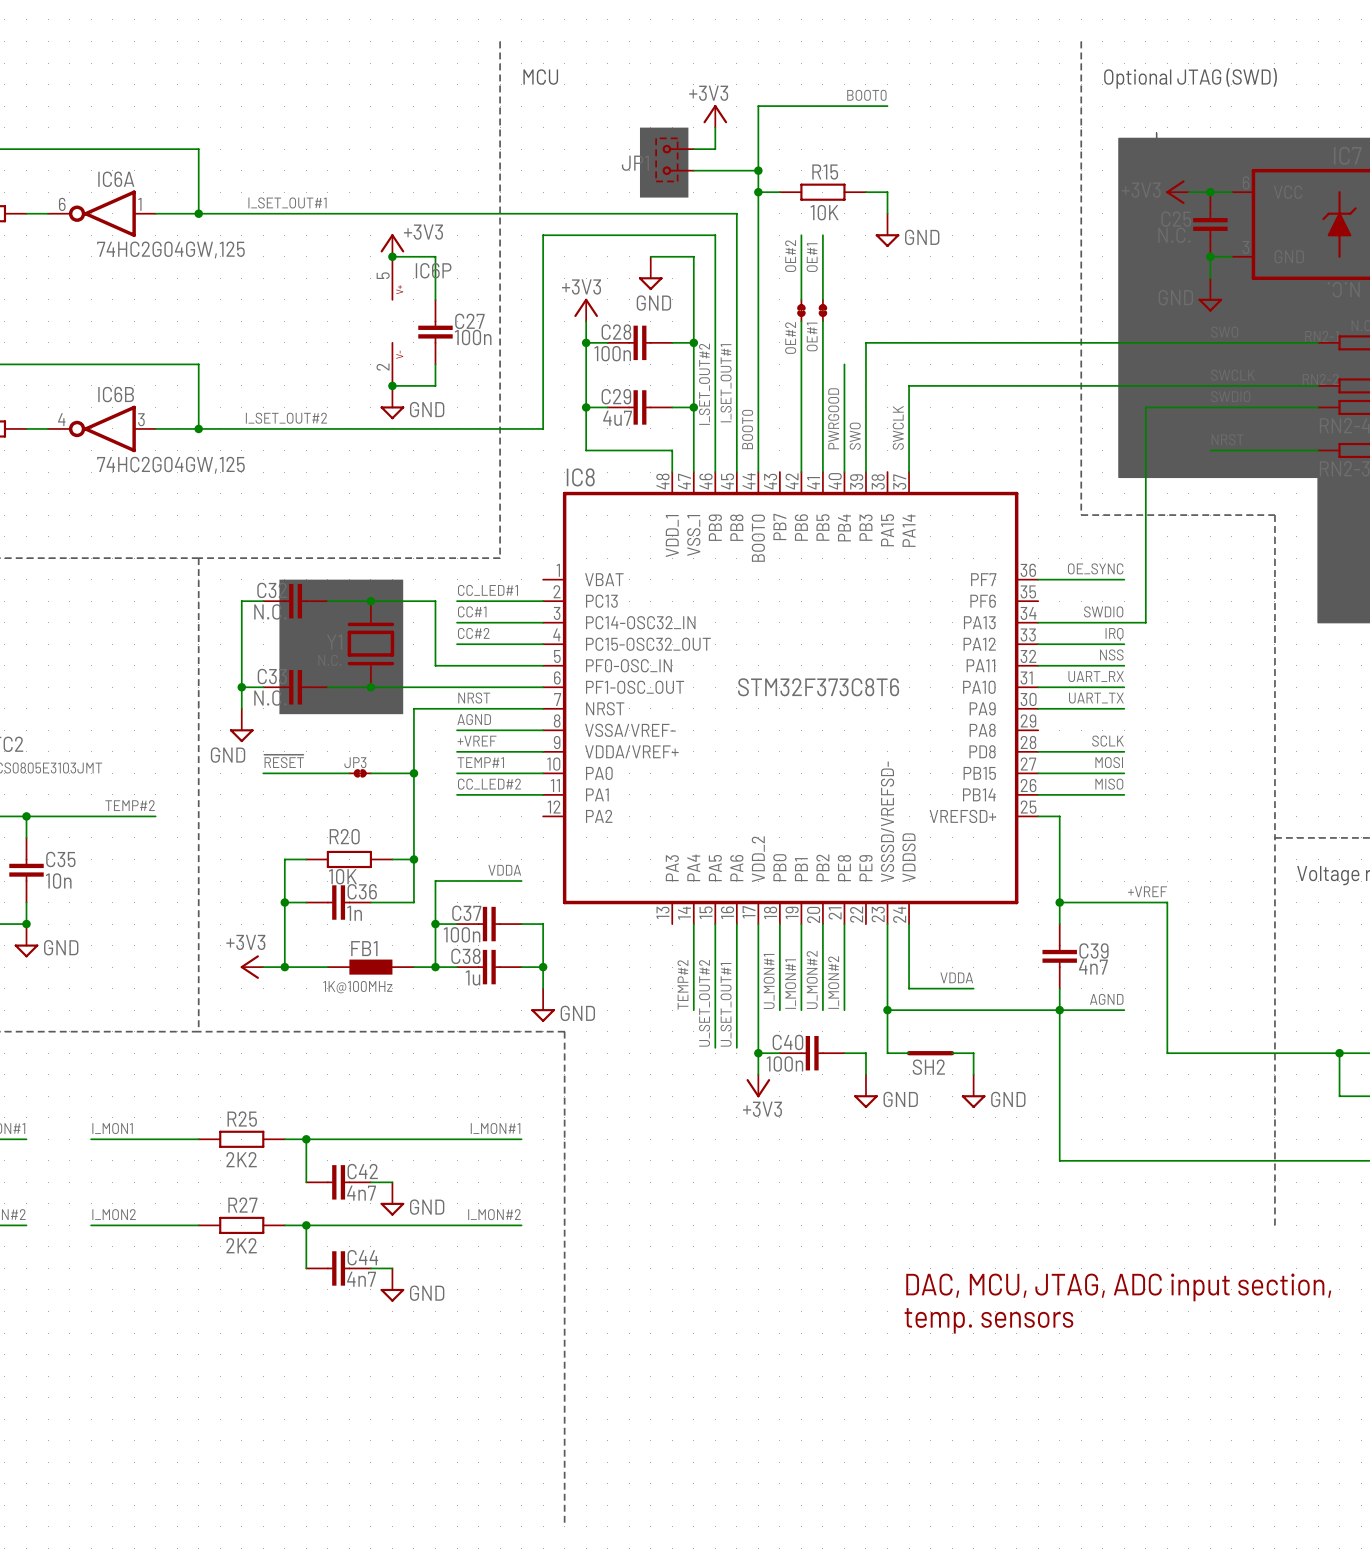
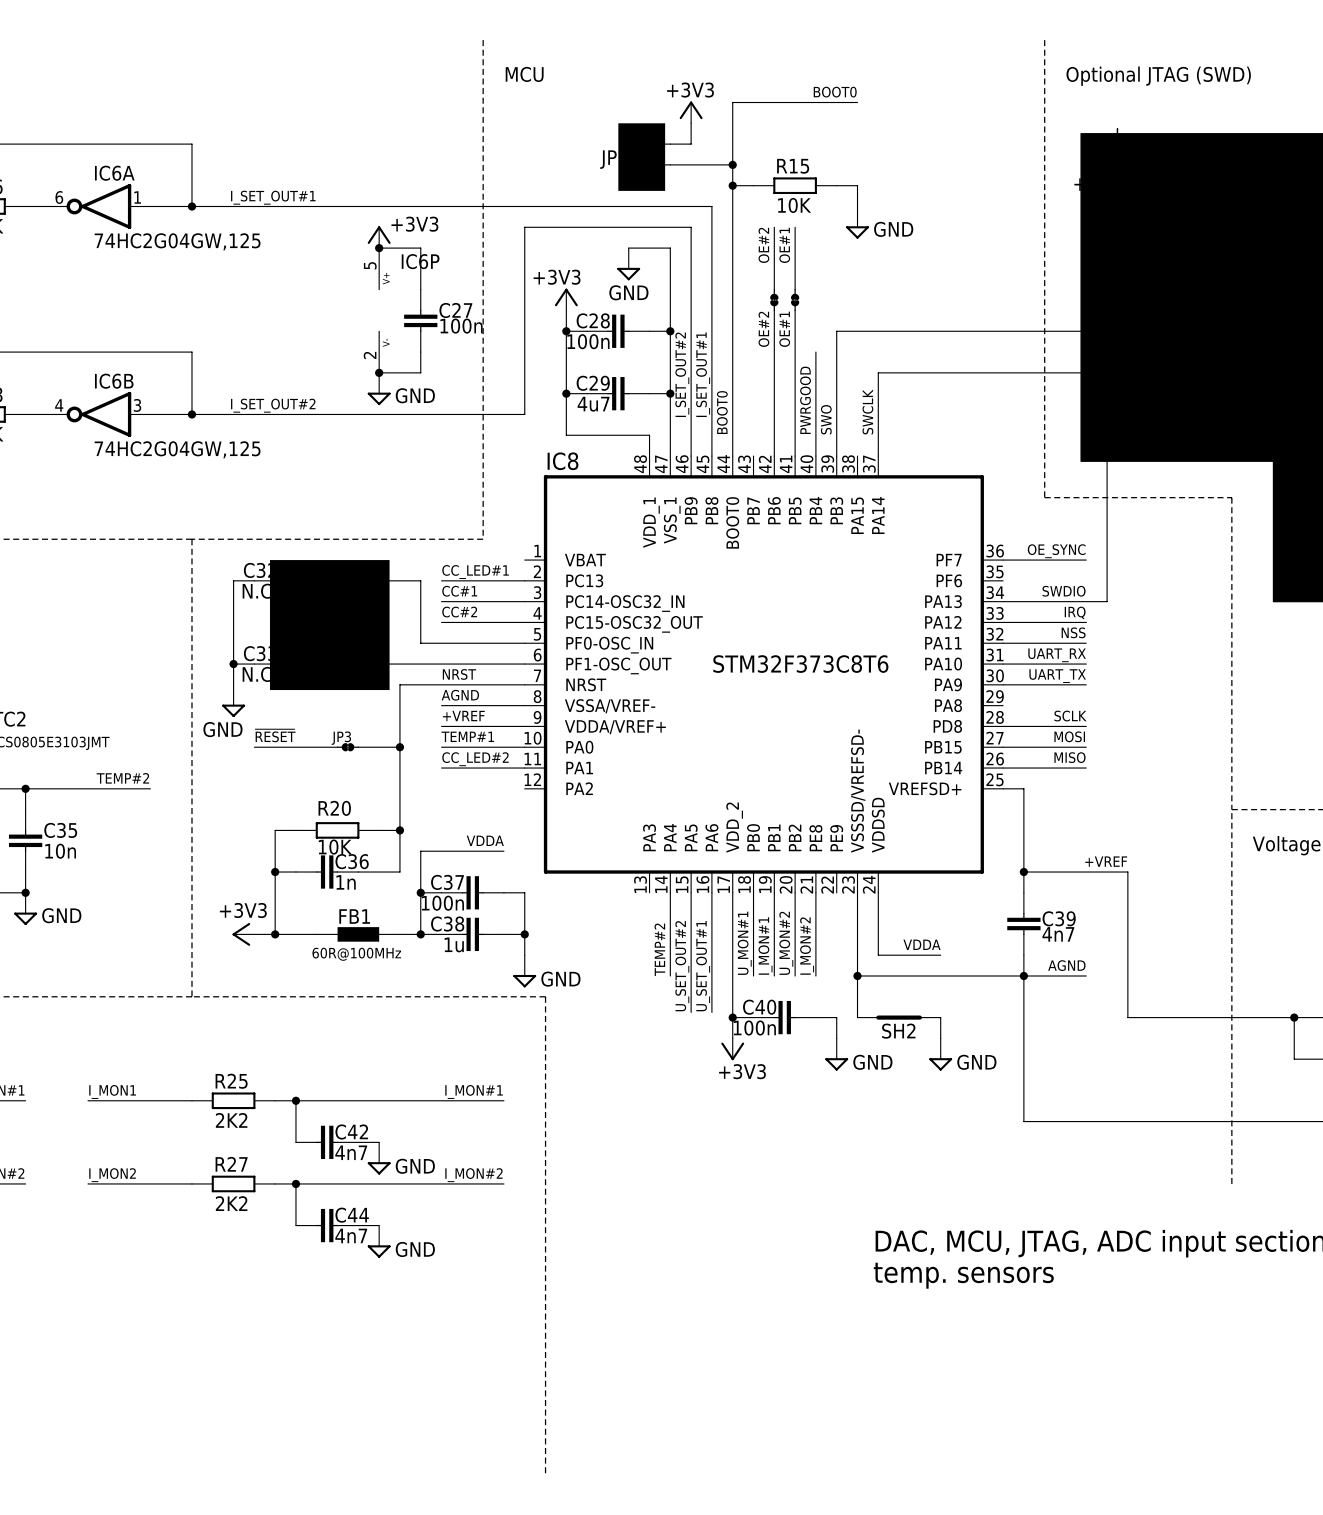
FB1 value: 1K@100MHz (357, 987) -> 60R@100MHz (356, 954)

